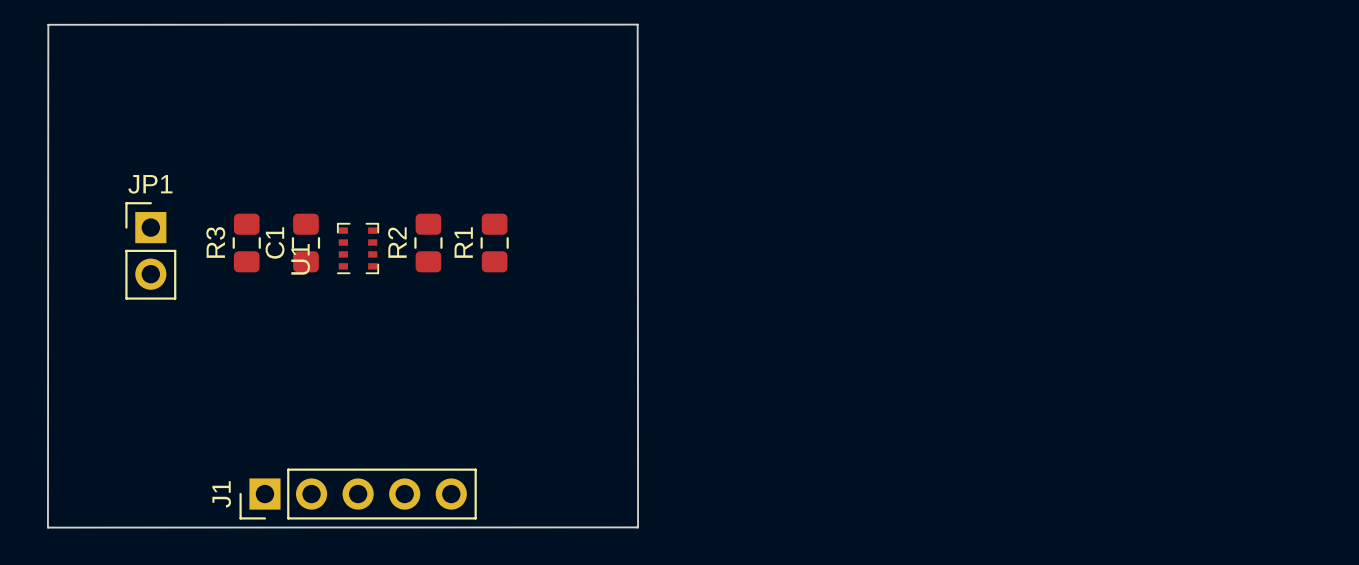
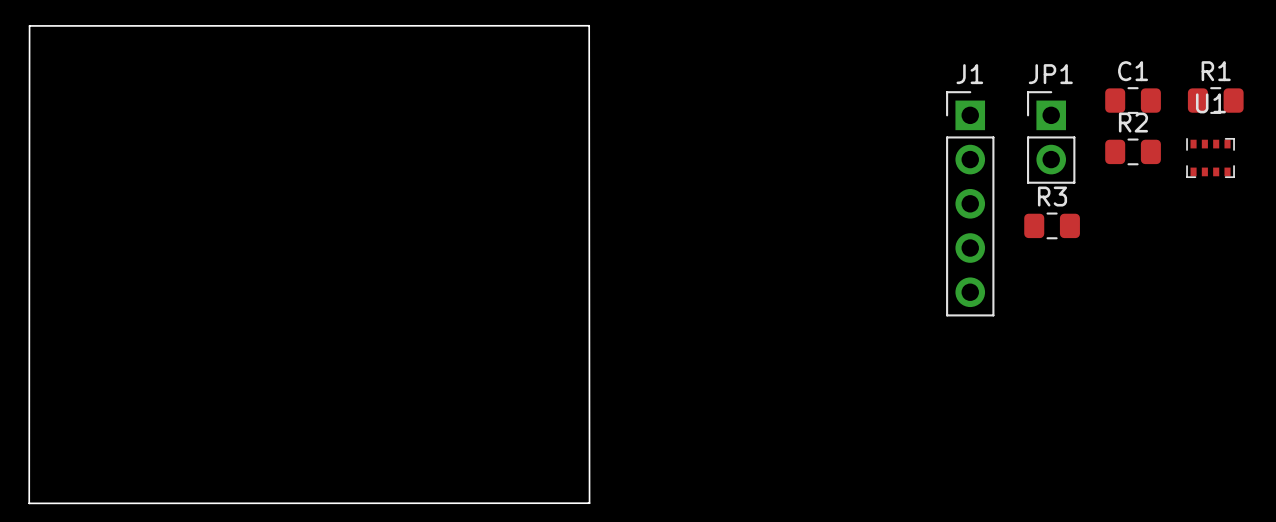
R3 rotation: 0° (246, 243) -> 90° clockwise (1052, 225)
R3 position: (246, 243) -> (1052, 225)
C1 rotation: 0° (305, 243) -> 90° clockwise (1133, 100)
C1 position: (305, 243) -> (1133, 100)
R2 rotation: 0° (428, 243) -> 90° clockwise (1133, 151)
R2 position: (428, 243) -> (1133, 151)
R1 rotation: 0° (494, 243) -> 90° clockwise (1215, 100)
R1 position: (494, 243) -> (1215, 100)
U1 rotation: 0° (358, 248) -> 90° clockwise (1210, 158)
U1 position: (358, 248) -> (1210, 158)
JP1 position: (150, 250) -> (1051, 137)
J1 rotation: 0° (358, 494) -> 90° clockwise (970, 203)
J1 position: (358, 494) -> (970, 203)

